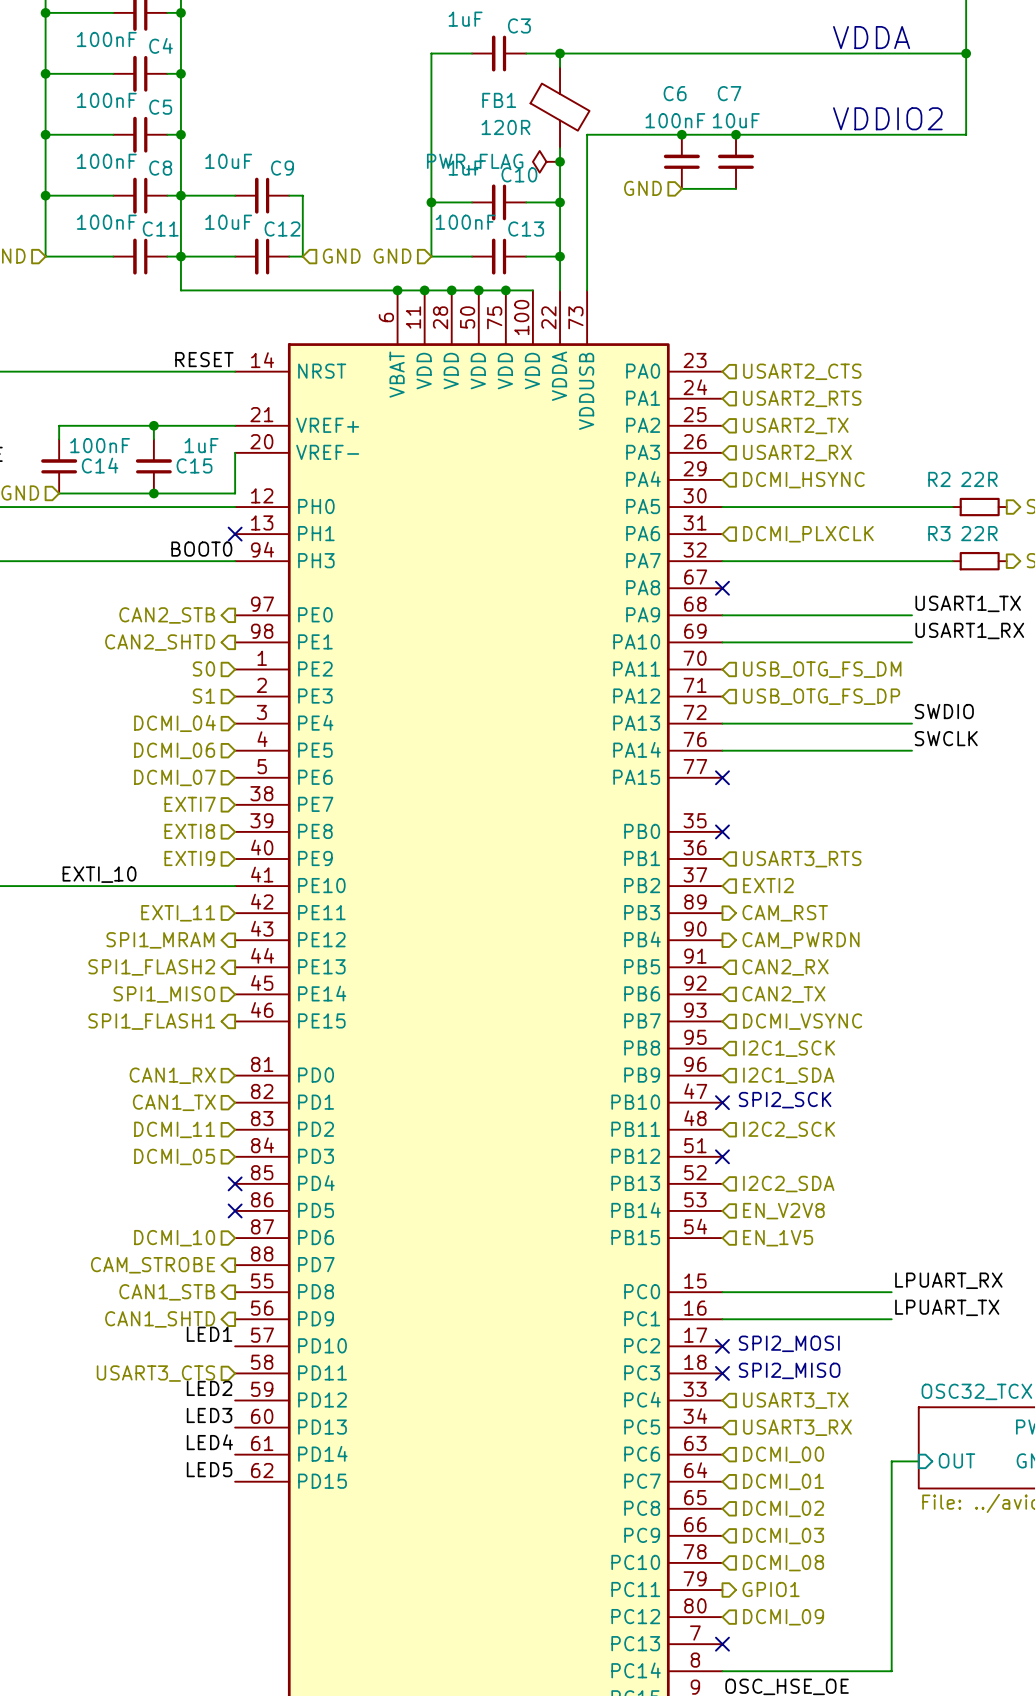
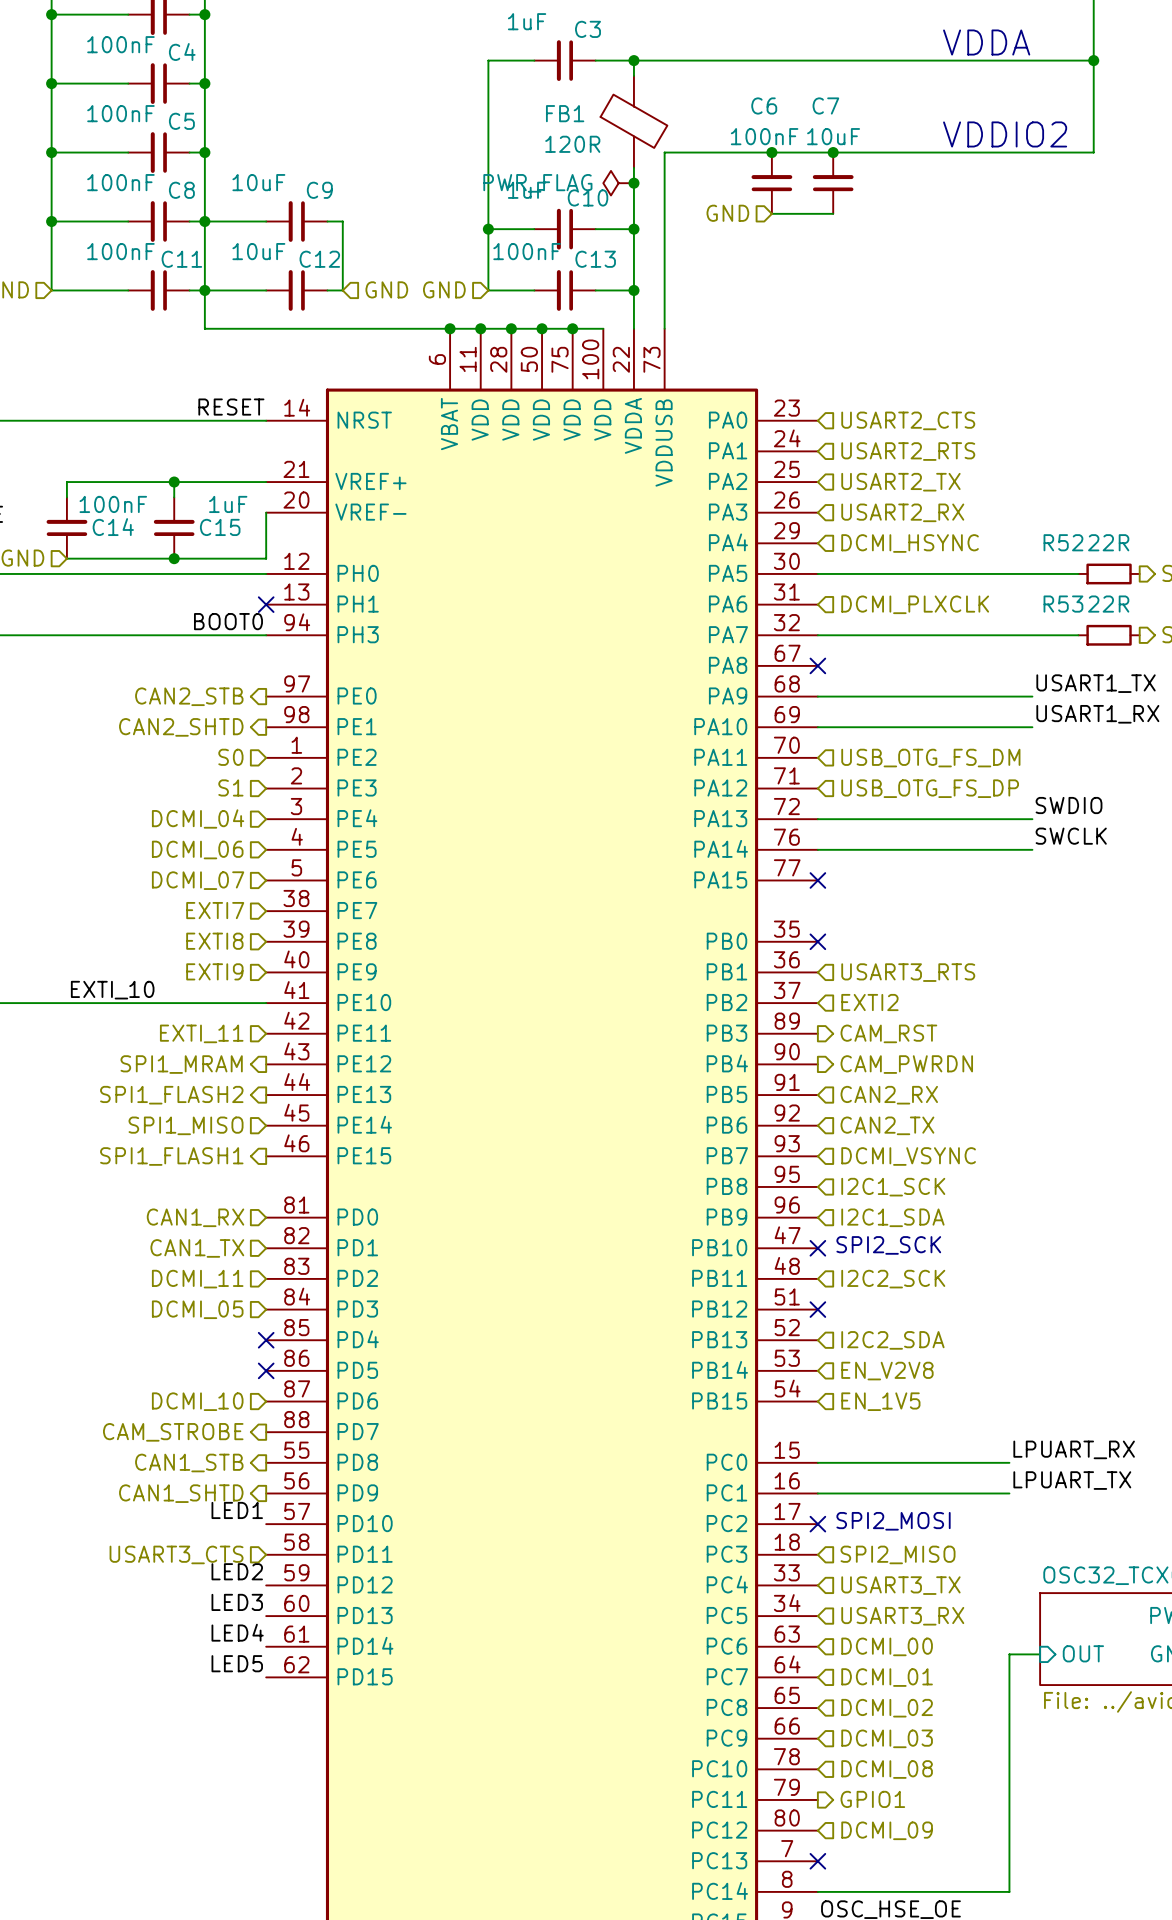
R2 name: R2 (939, 479) -> R52 (1063, 542)
R3 name: R3 (939, 533) -> R53 (1063, 604)
text: SPI2_MISO (789, 1370) -> none
no-connect mark: (722, 1373) -> none
hierarchical label: none -> SPI2_MISO (898, 1554)

